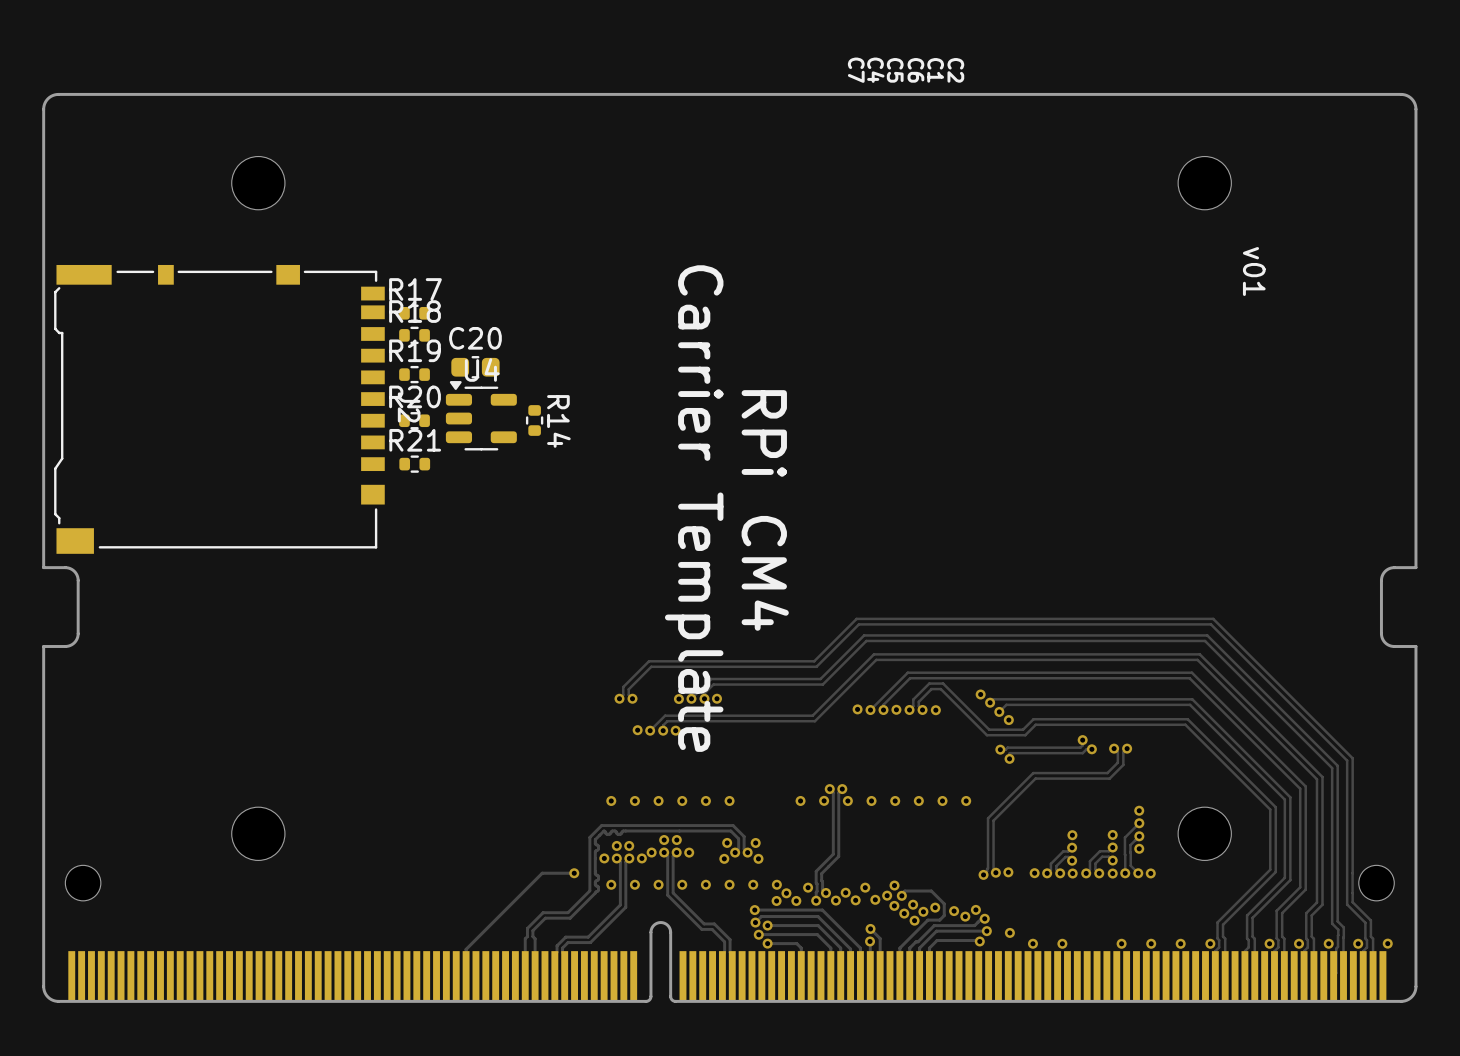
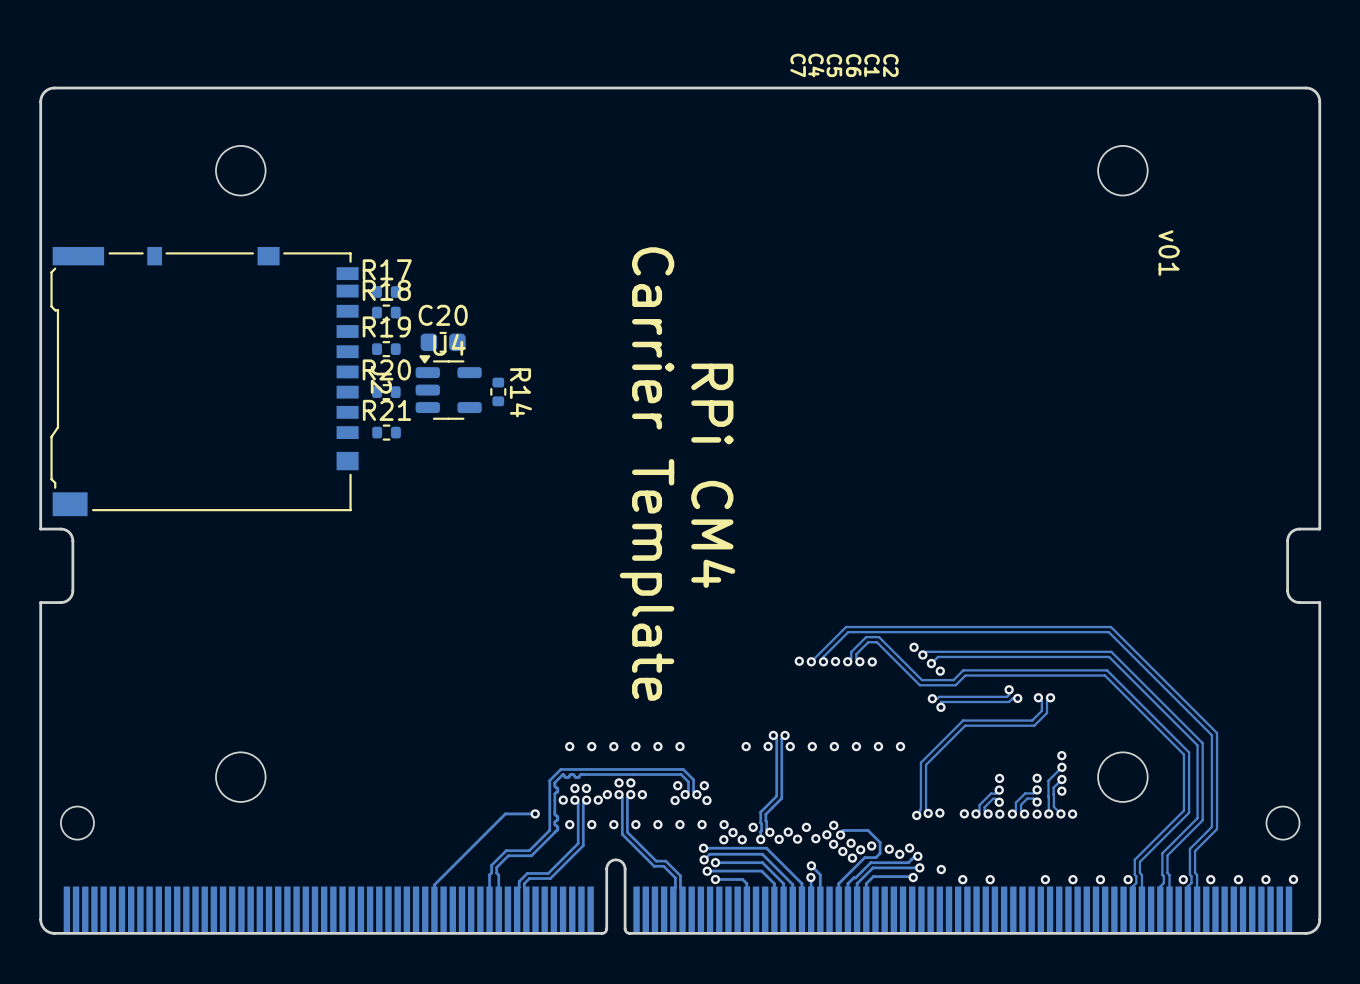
track: (619, 698) (623, 694) (623, 687) (649, 661) (814, 661) (856, 618) (1213, 618) (1352, 758) (1352, 902) (1370, 920) (1373, 975) -> none
via: (619, 698) -> none
track: (632, 698) (628, 694) (628, 689) (651, 666) (816, 666) (858, 624) (1210, 624) (1347, 760) (1347, 904) (1365, 922) (1366, 947) (1363, 951) (1363, 975) -> none
via: (632, 698) -> none
track: (691, 698) (711, 679) (820, 679) (864, 635) (1207, 635) (1337, 765) (1337, 921) (1343, 927) (1343, 975) -> none
via: (691, 698) -> none
track: (704, 698) (704, 693) (713, 684) (822, 684) (866, 640) (1205, 640) (1332, 768) (1332, 923) (1338, 929) (1336, 973) (1333, 975) -> none
via: (704, 698) -> none
via: (717, 698) -> none
via: (678, 699) -> none
via: (637, 730) -> none
track: (650, 730) (665, 715) (812, 715) (873, 654) (1199, 654) (1322, 777) (1322, 904) (1311, 915) (1313, 975) -> none
via: (650, 730) -> none
track: (663, 730) (663, 725) (667, 721) (814, 721) (876, 659) (1197, 659) (1316, 779) (1316, 902) (1306, 913) (1307, 947) (1304, 951) (1304, 975) -> none
via: (663, 730) -> none
via: (675, 730) -> none

